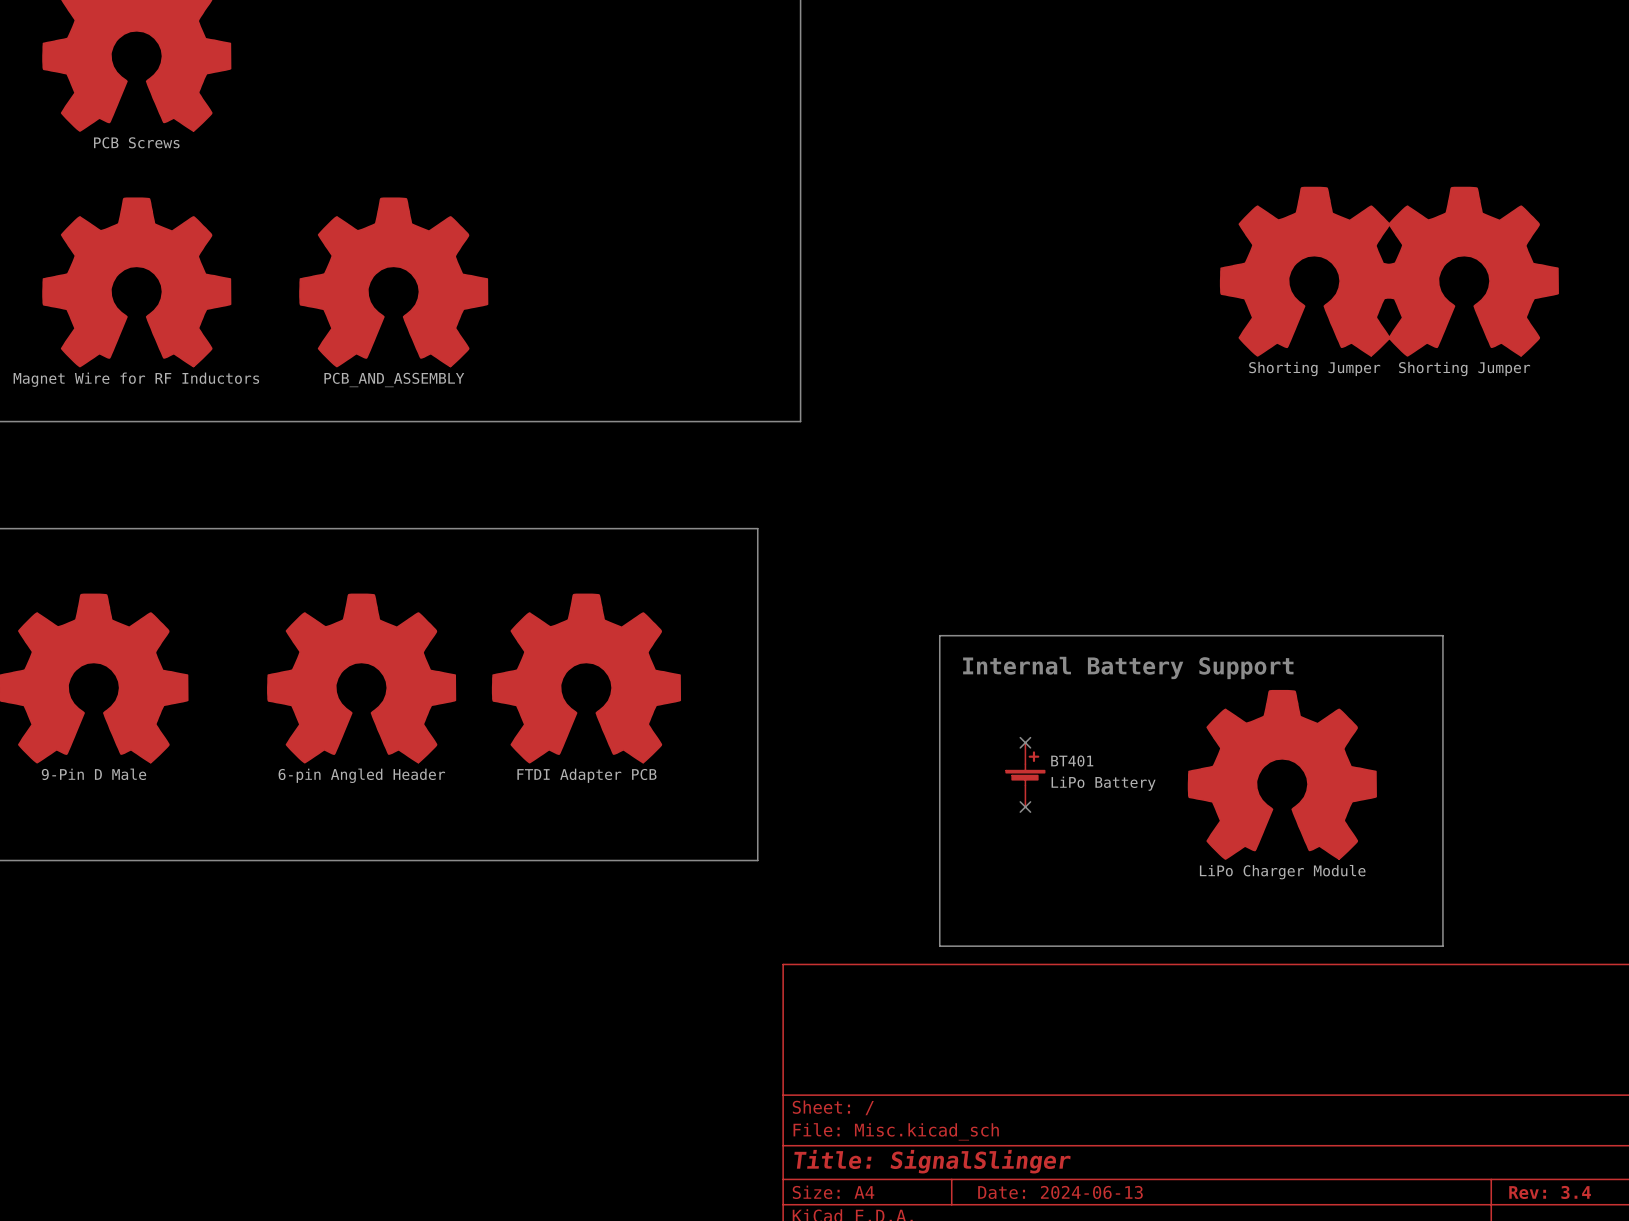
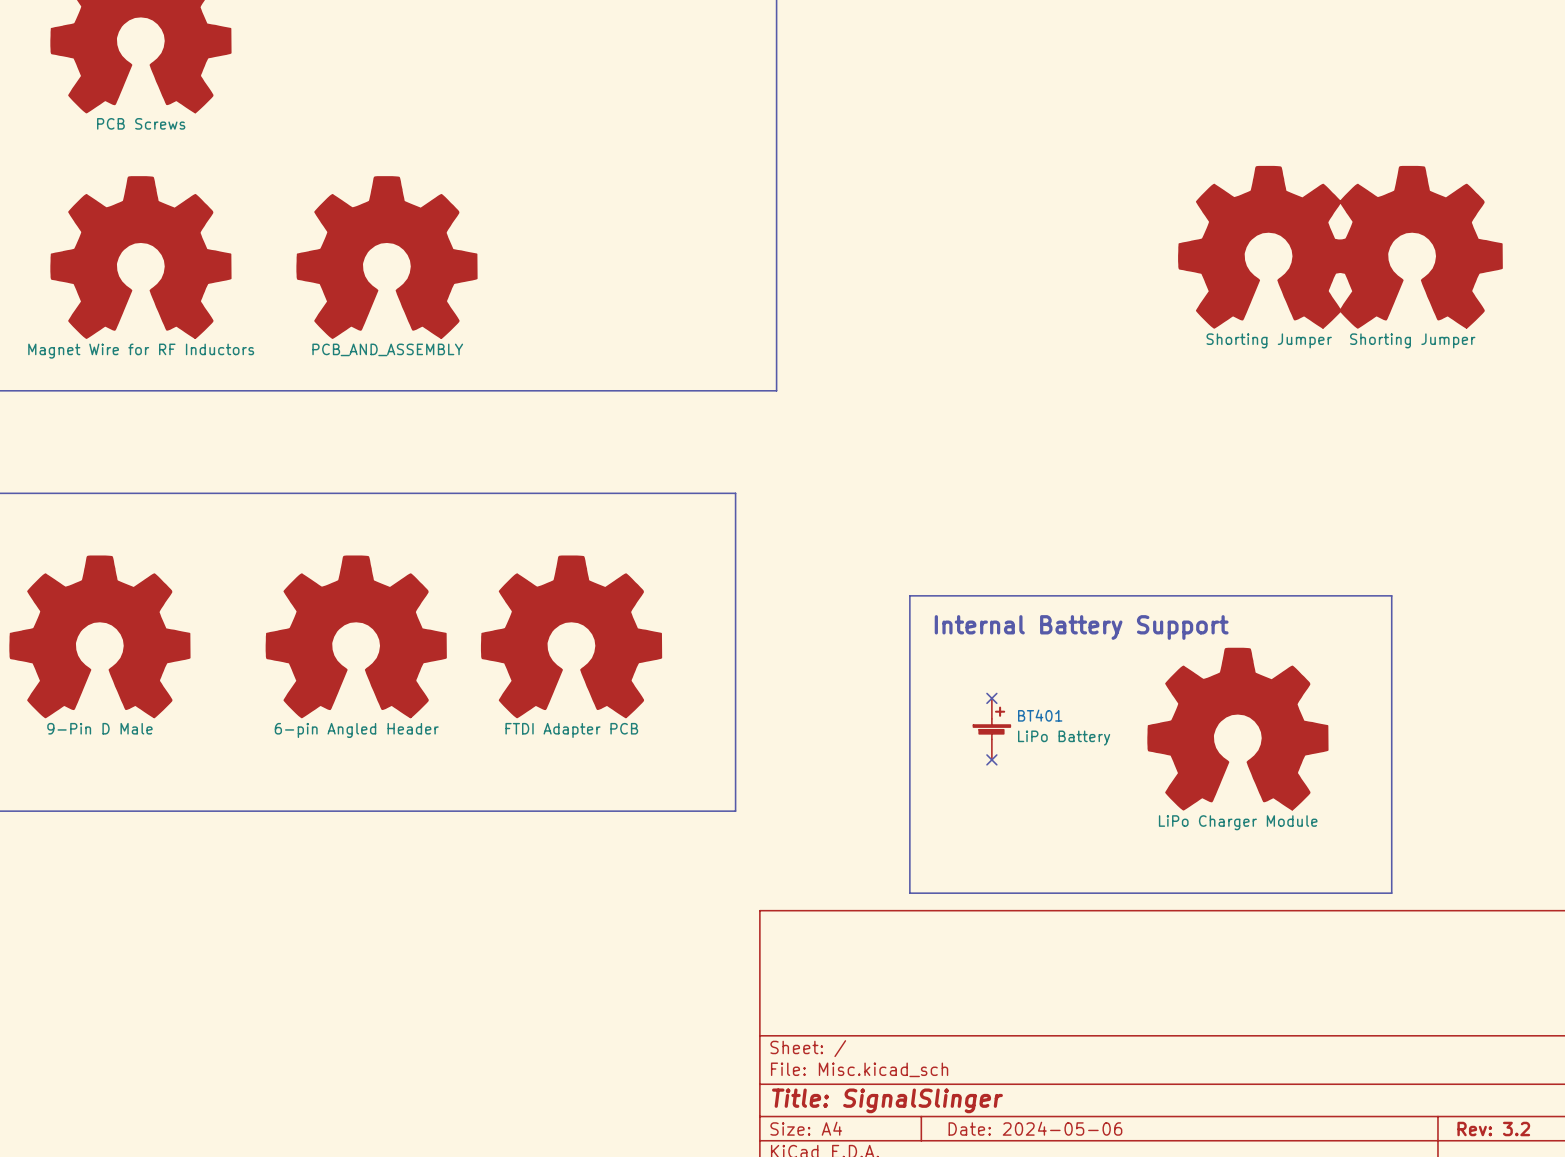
title block: Date: 2024-06-13 (1060, 1192) -> Date: 2024-05-06 (1035, 1128)
title block: Rev: 3.4 (1550, 1192) -> Rev: 3.2 (1493, 1129)

